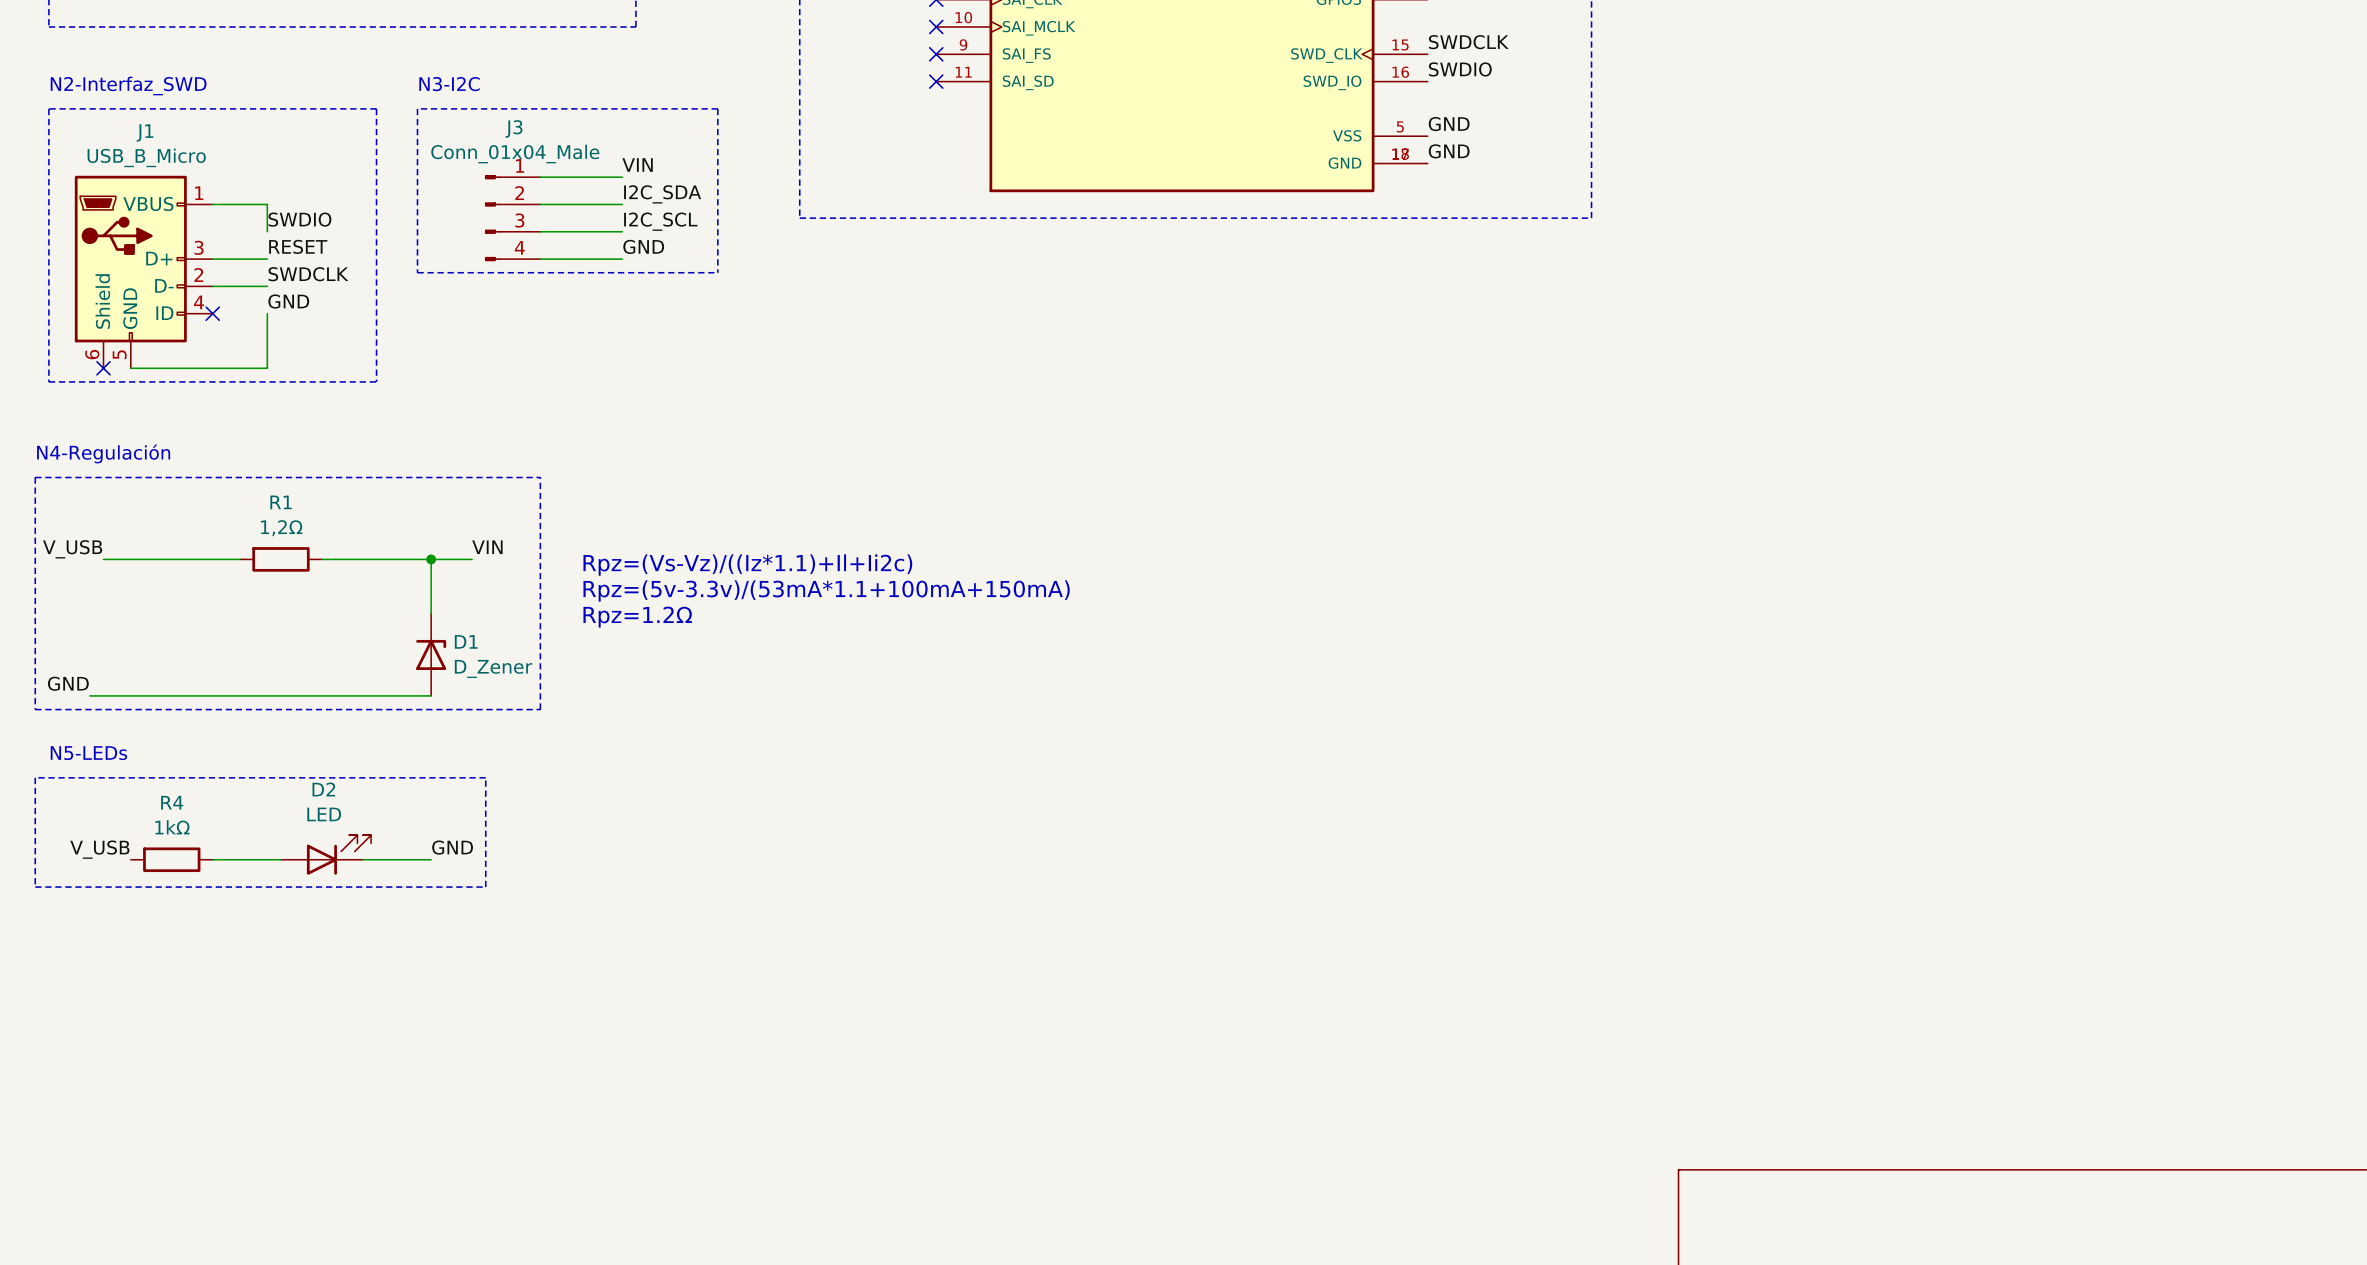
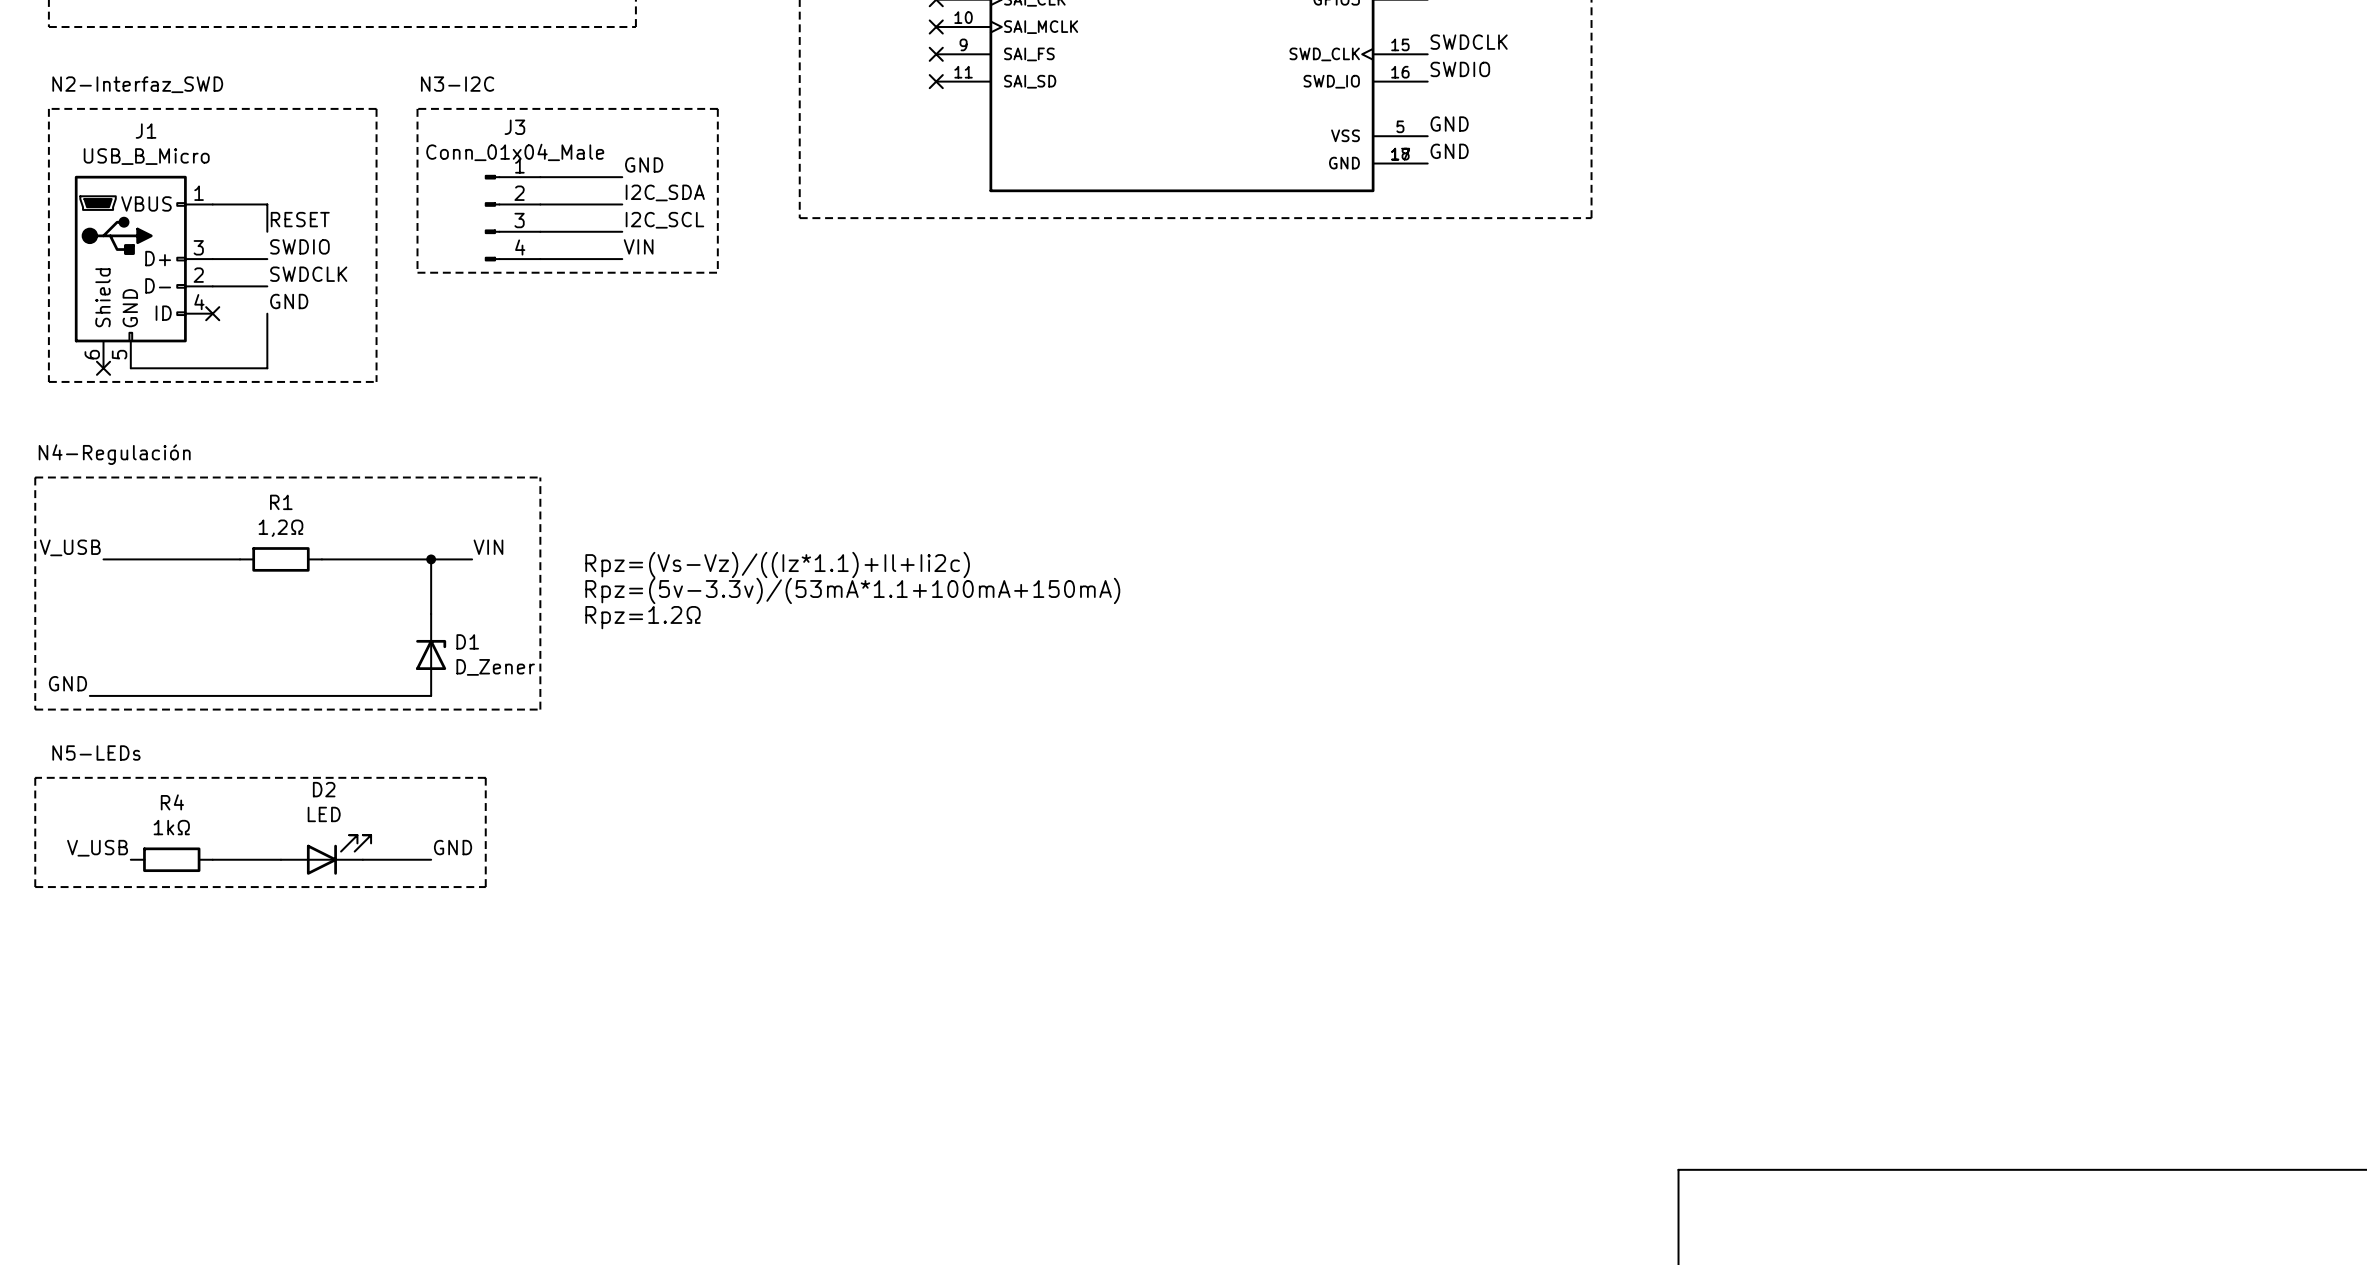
label: VIN (637, 164) -> GND (644, 164)
label: SWDIO (299, 219) -> RESET (300, 219)
label: RESET (298, 246) -> SWDIO (299, 246)
label: GND (643, 246) -> VIN (638, 246)

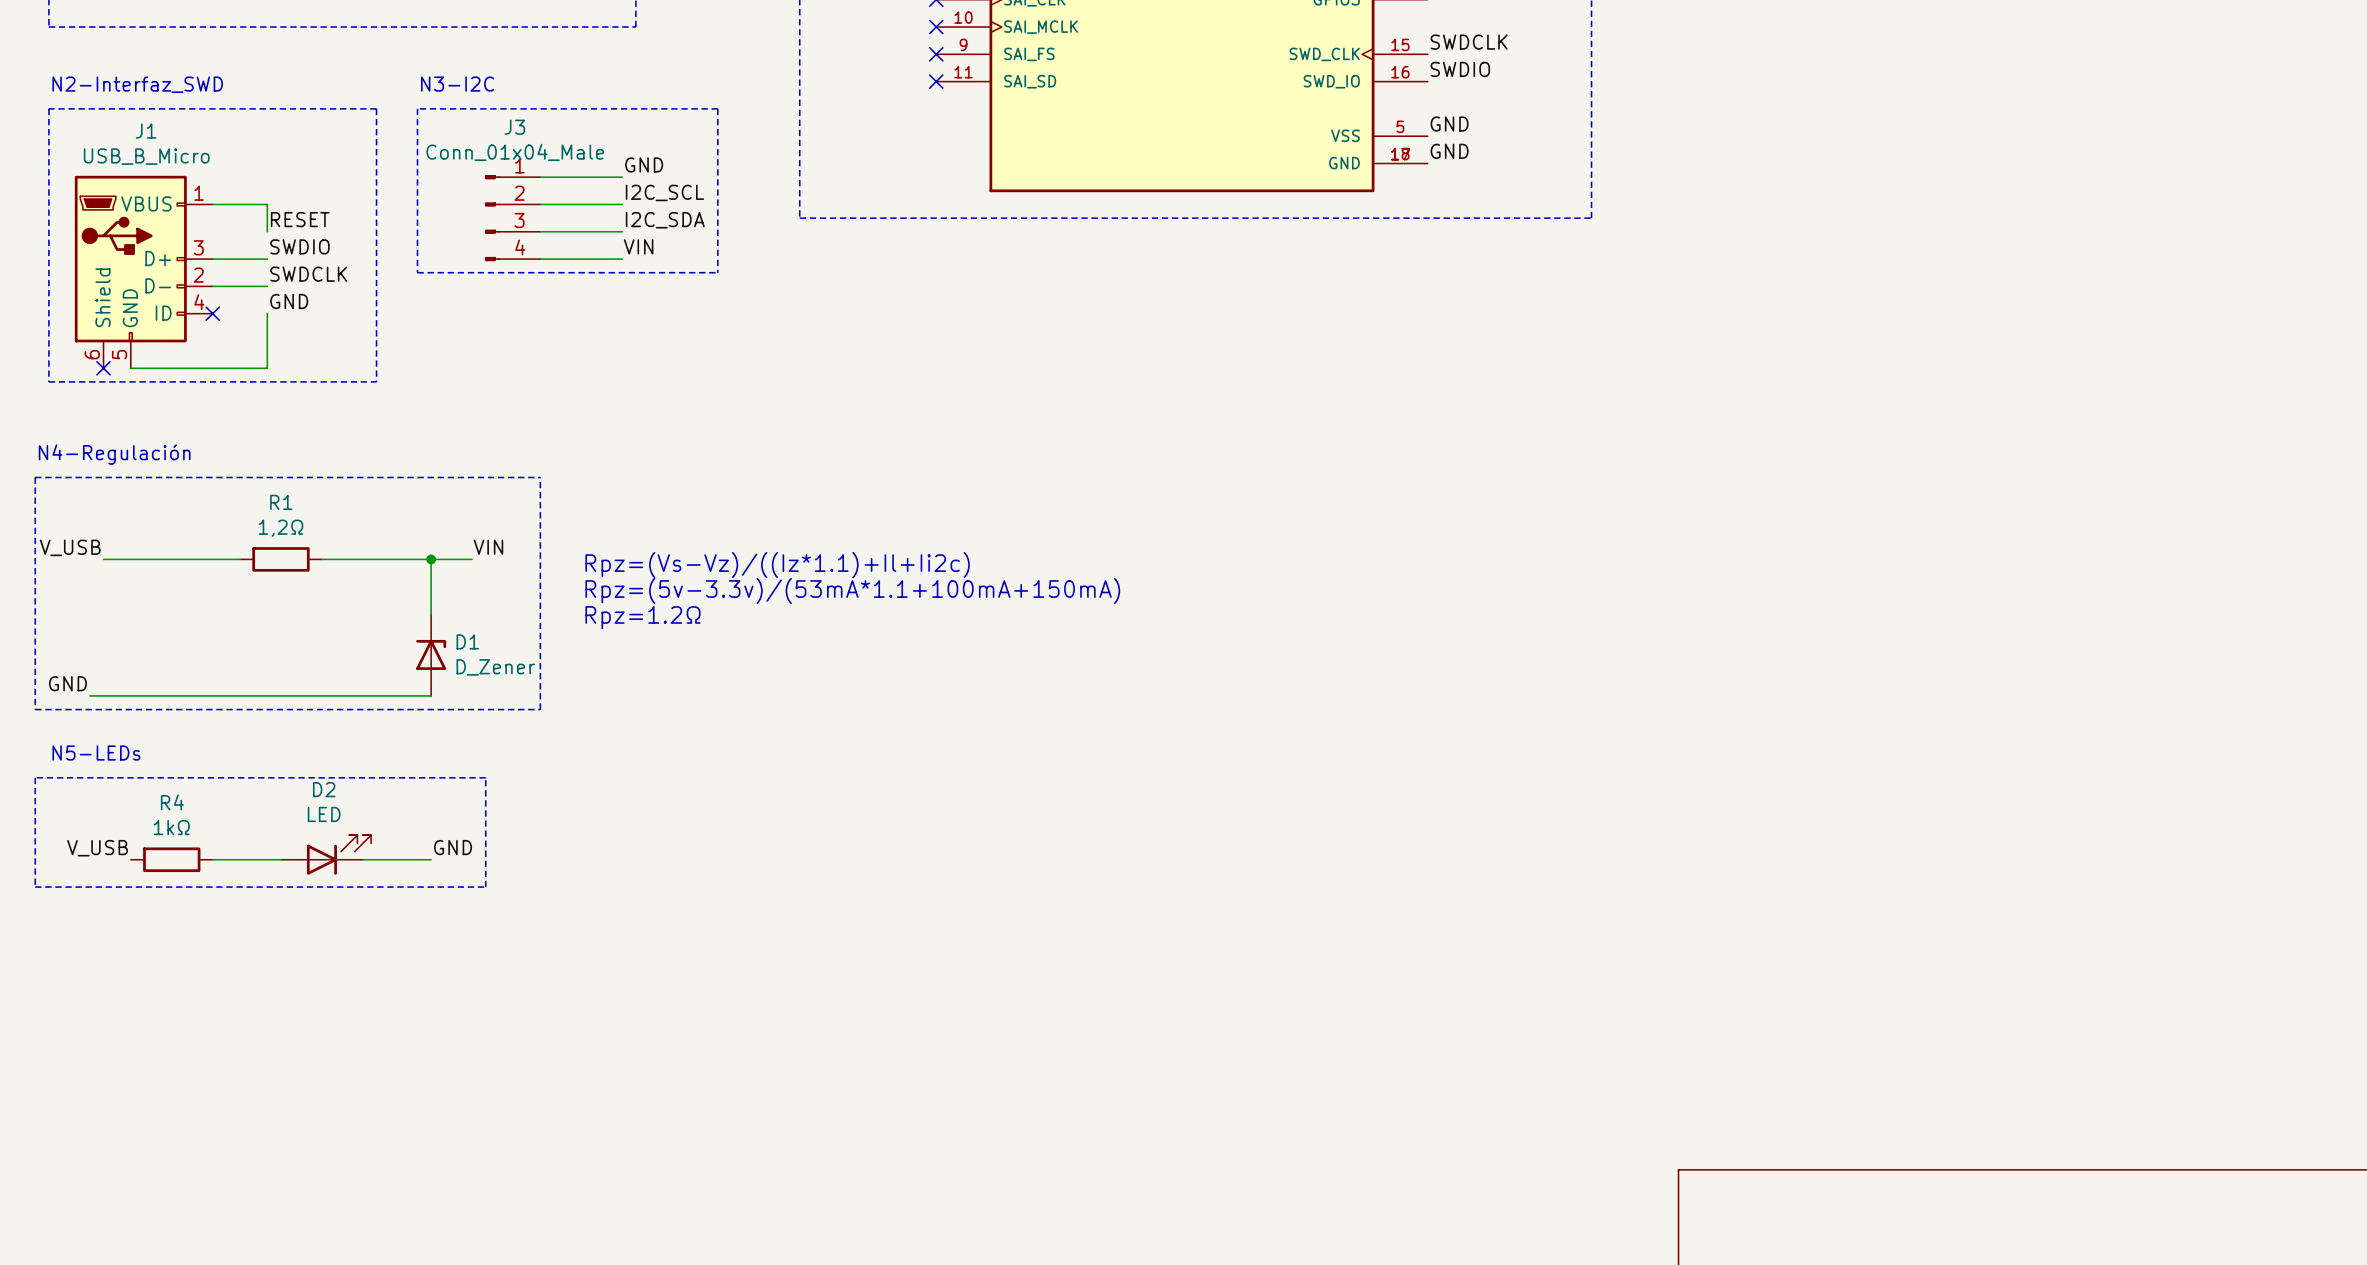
label: I2C_SDA (665, 192) -> I2C_SCL (664, 192)
label: I2C_SCL (664, 220) -> I2C_SDA (665, 220)

